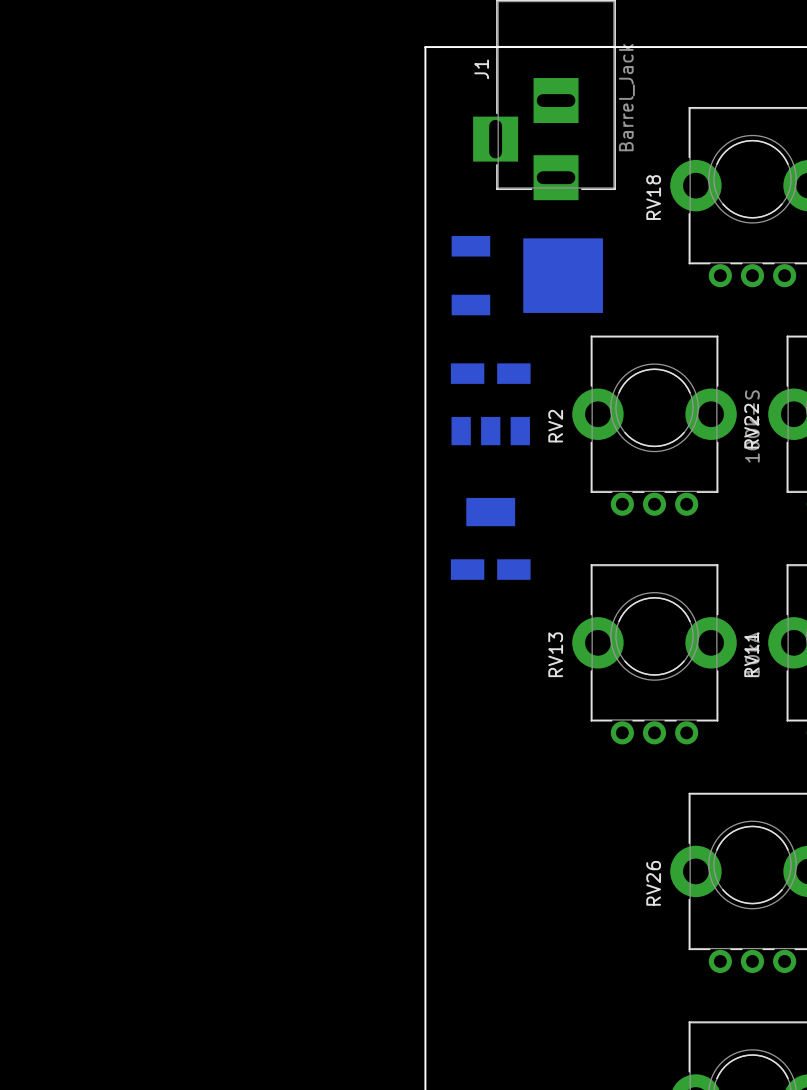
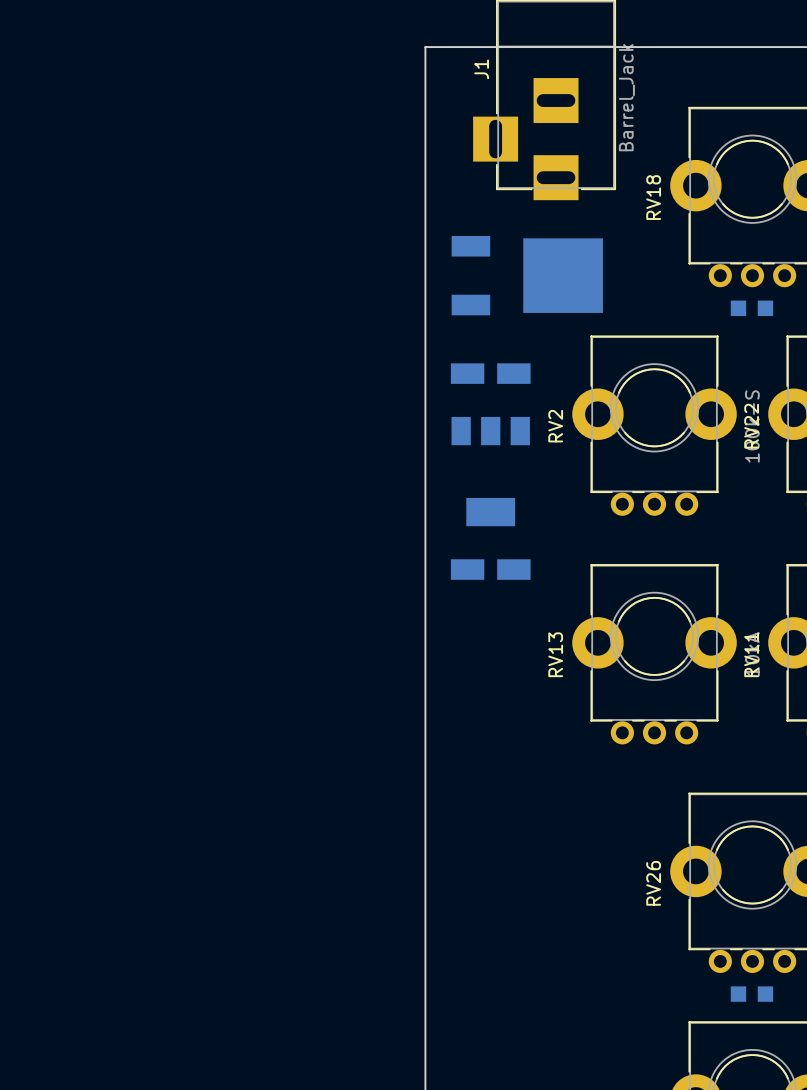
part: none -> (751, 308)
part: none -> (751, 994)

